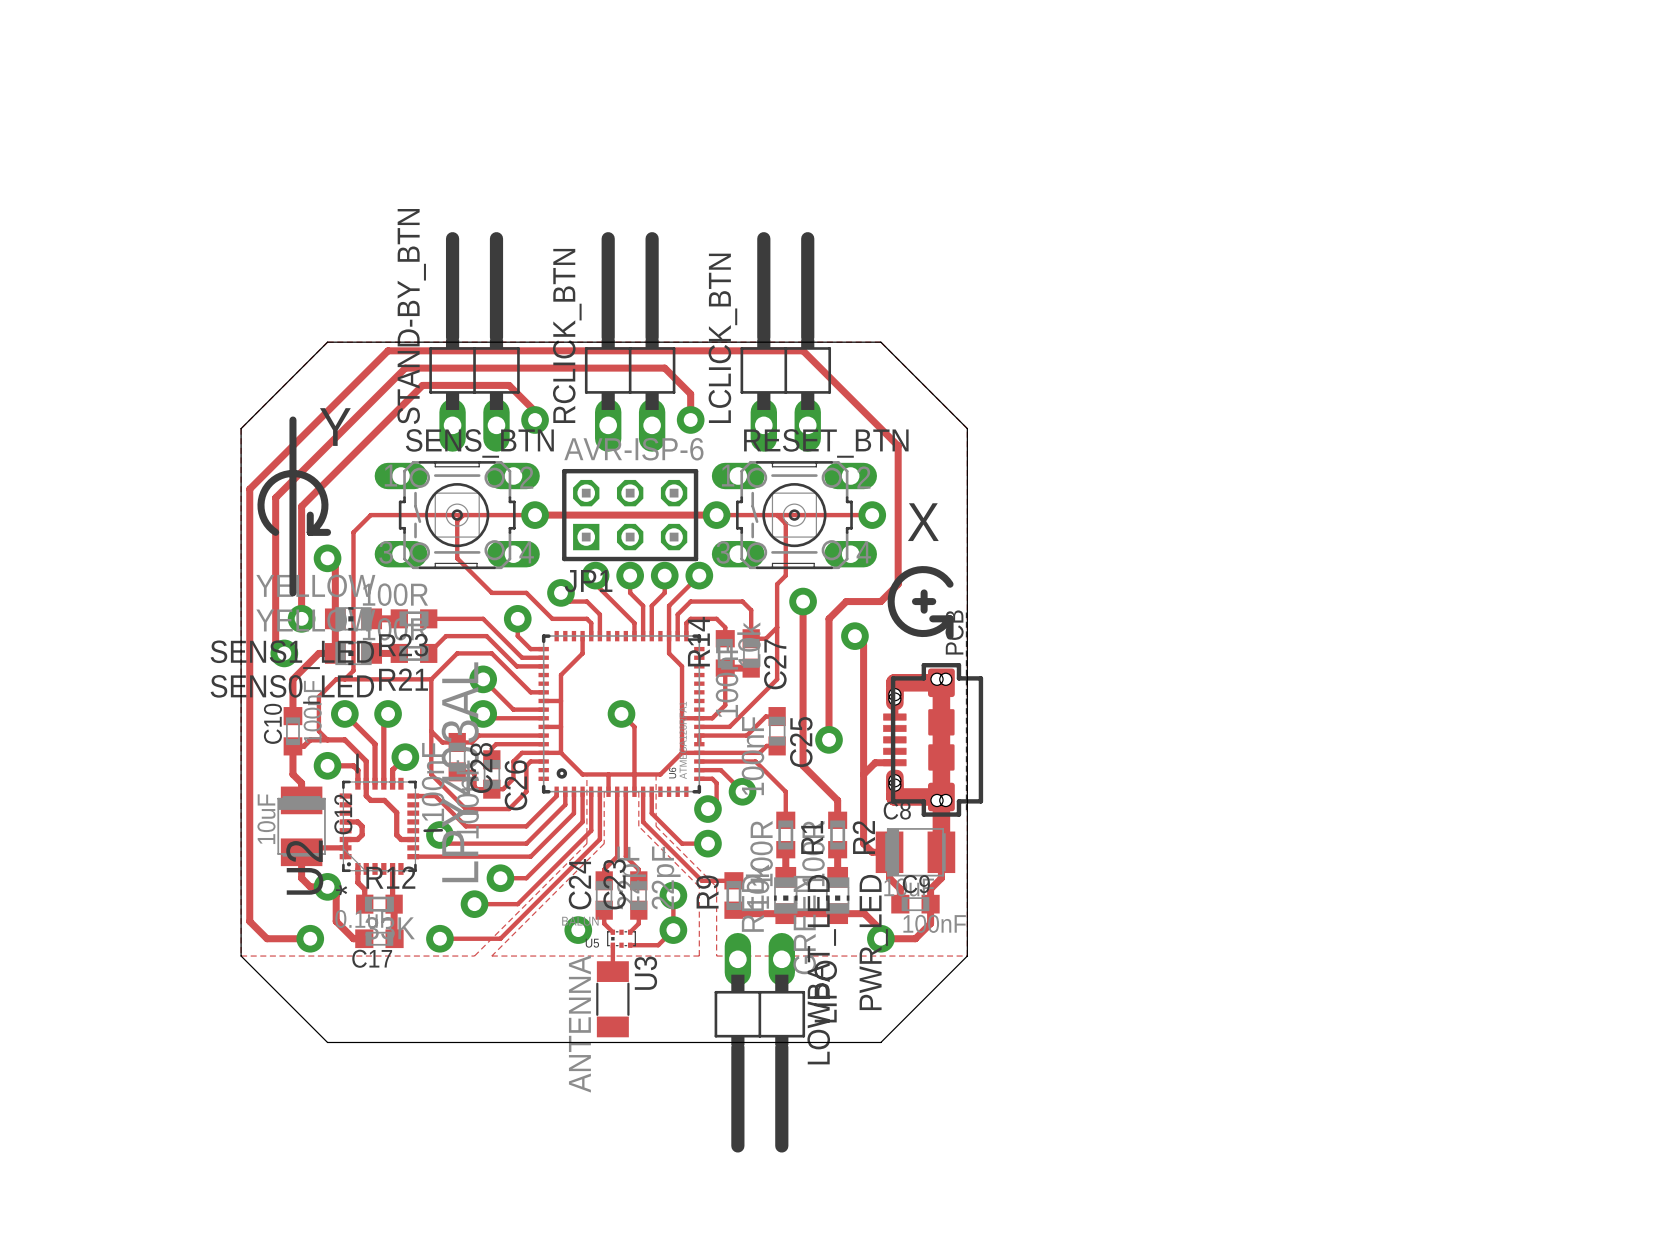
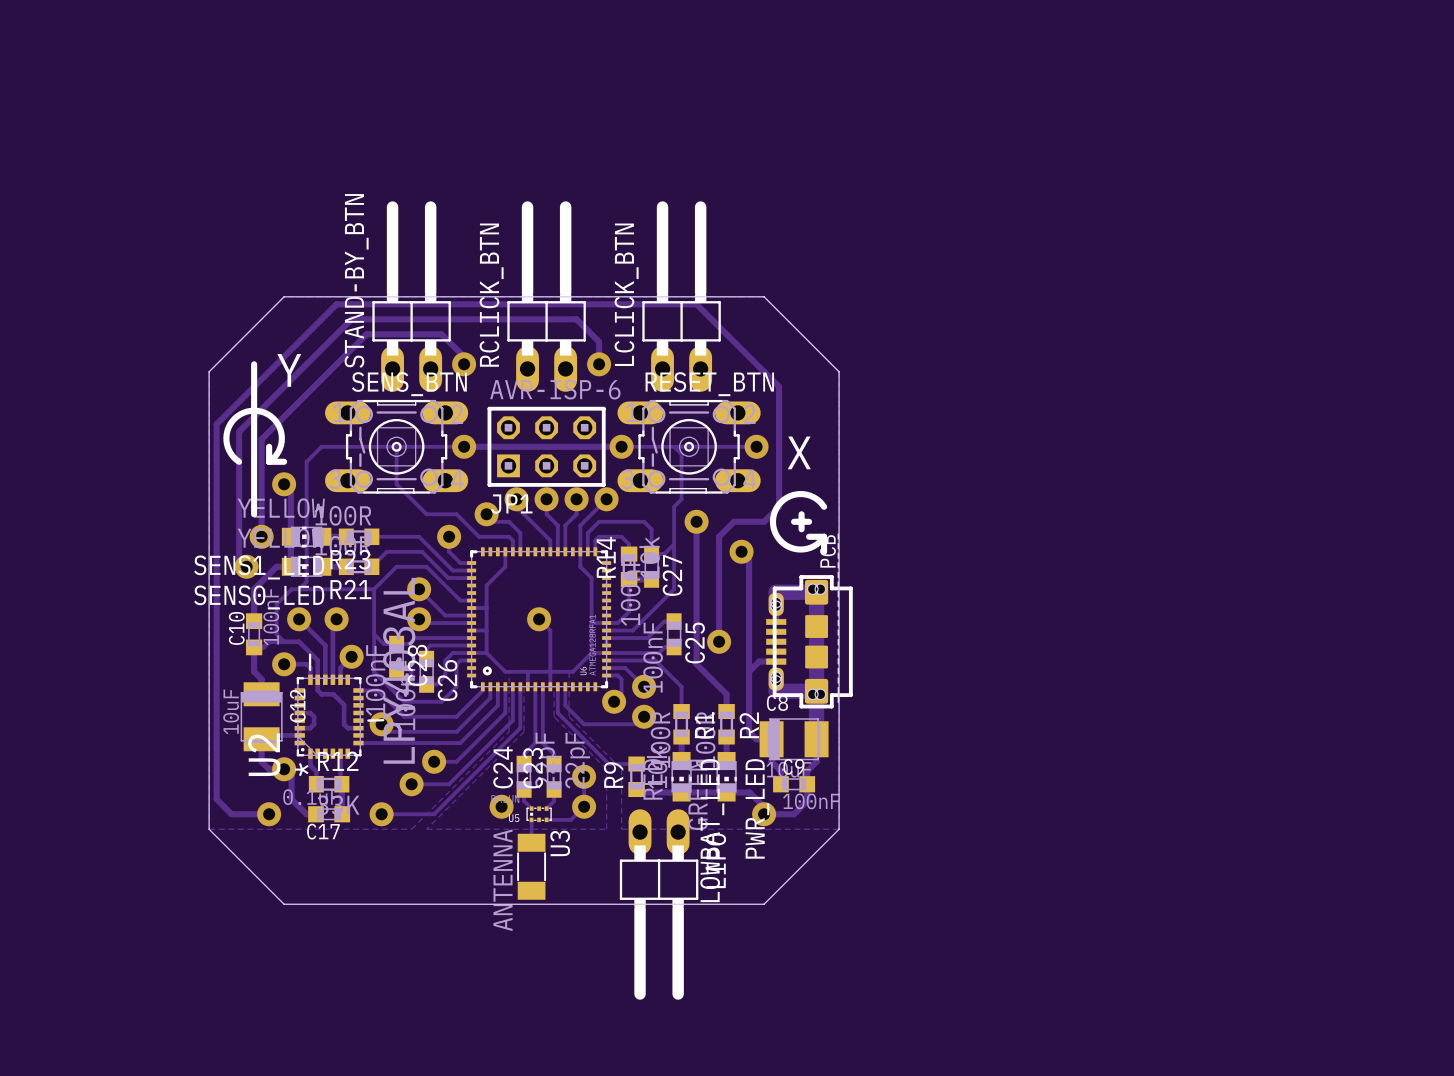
track: (673, 834) (682, 843) (707, 843) -> (584, 724) (636, 724) (644, 716)
via position: (707, 843) -> (644, 716)

